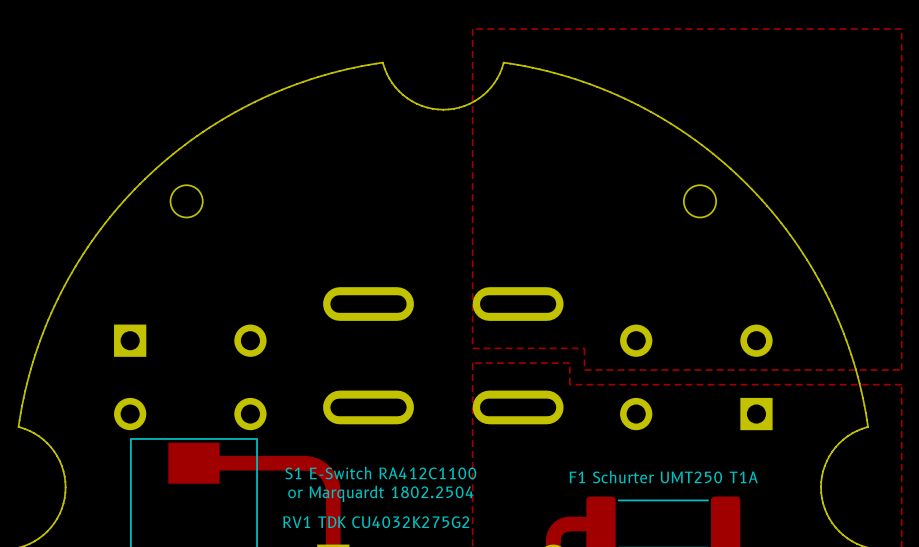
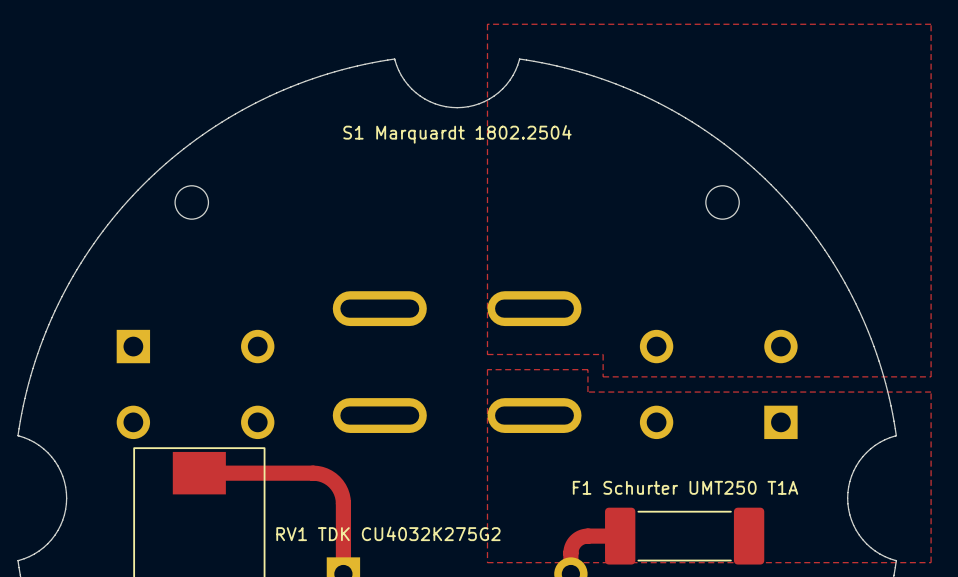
text: none -> S1 Marquardt 1802.2504 (457, 134)
text: S1 E-Switch RA412C1100 (380, 473) -> none
text: or Marquardt 1802.2504 (380, 493) -> none

